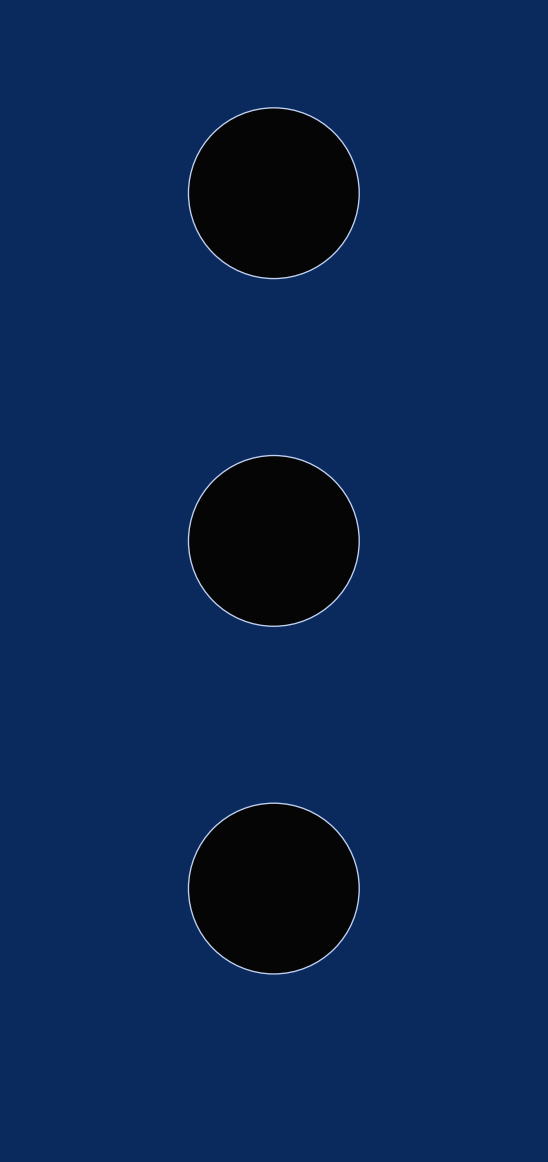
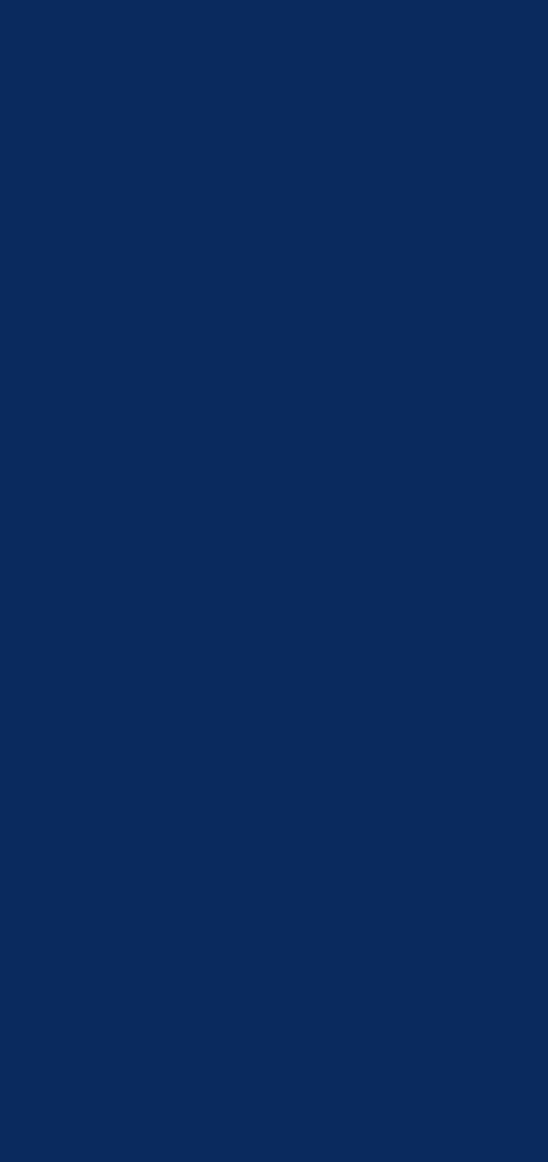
part: (273, 193) -> none
part: (273, 540) -> none
part: (273, 888) -> none

